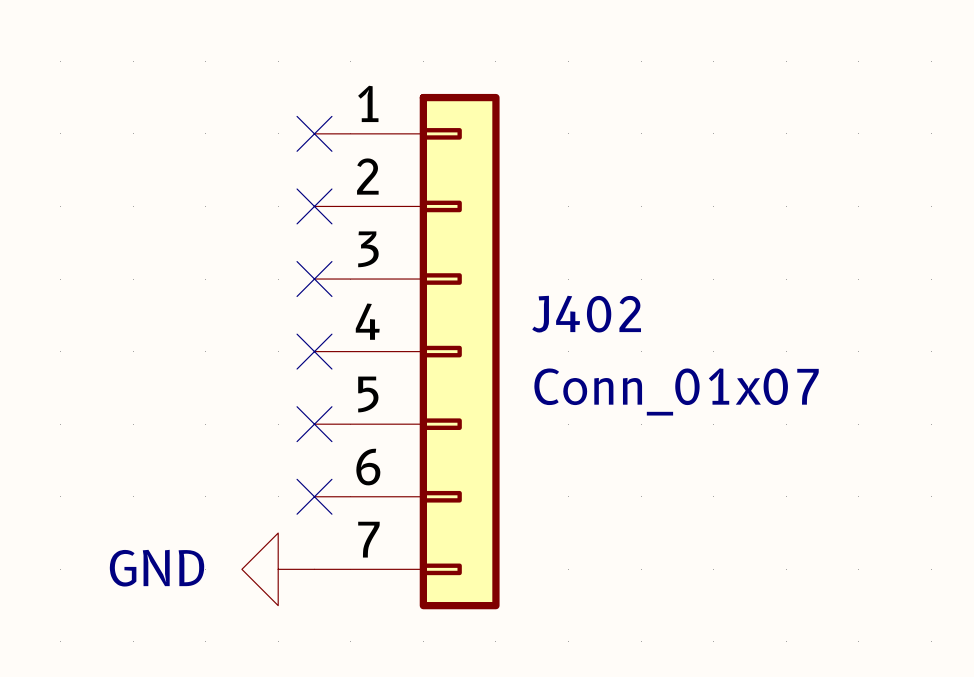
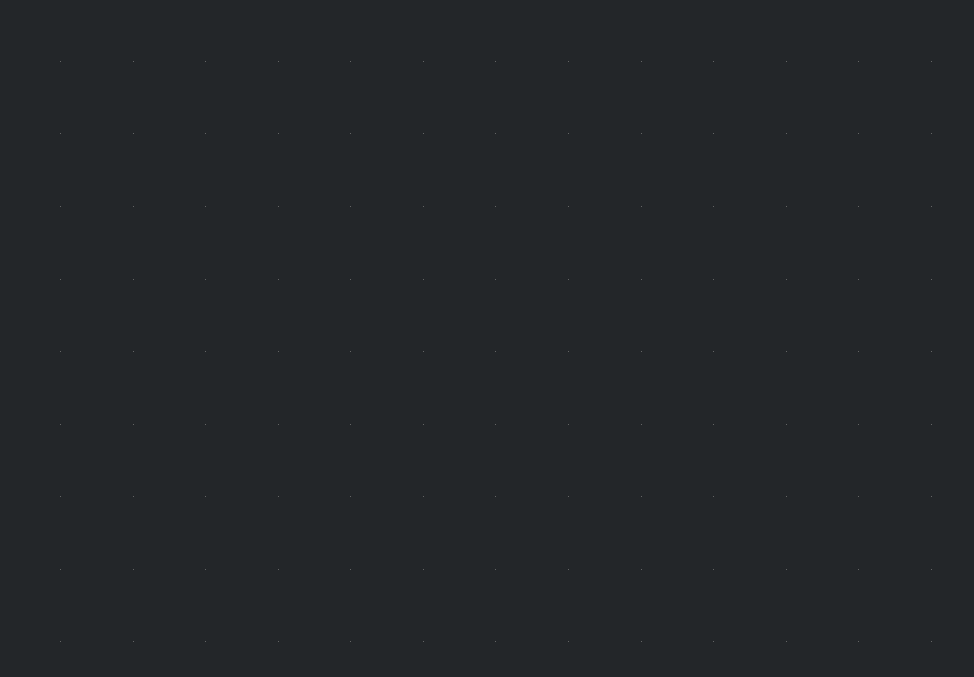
no-connect mark: (314, 133) -> none
no-connect mark: (314, 206) -> none
no-connect mark: (314, 279) -> none
no-connect mark: (314, 351) -> none
J402: Conn_01x07 (407, 351) -> none
no-connect mark: (314, 424) -> none
no-connect mark: (314, 496) -> none
power symbol: GND (278, 569) -> none

